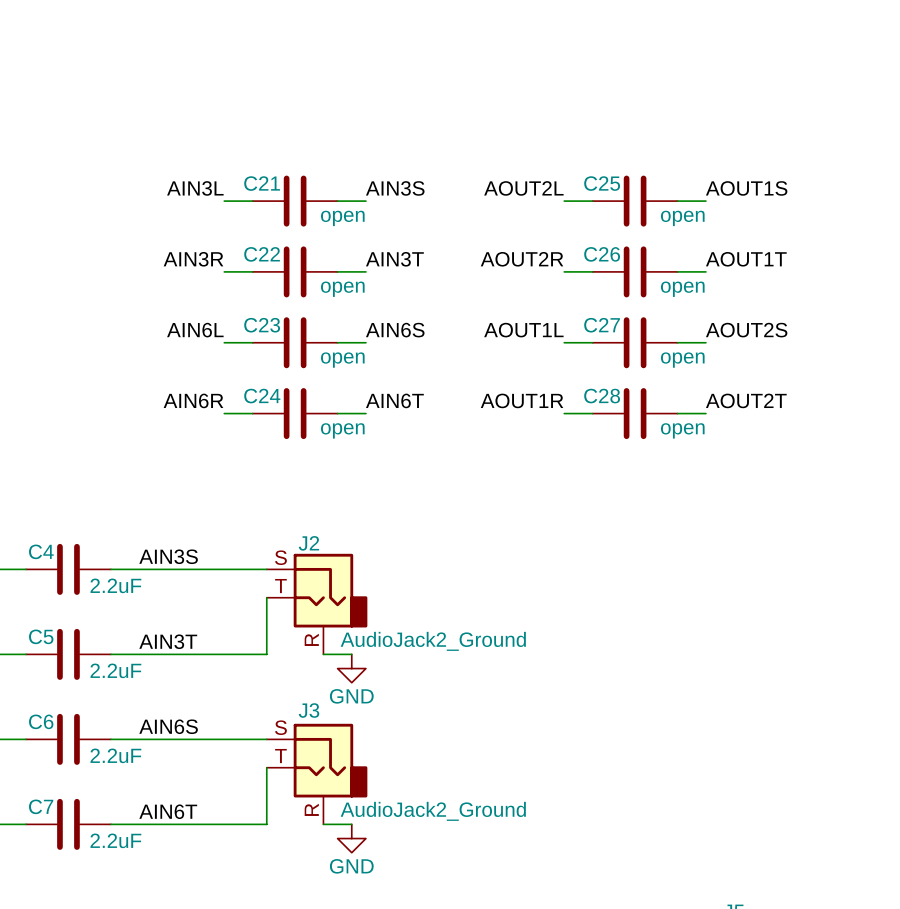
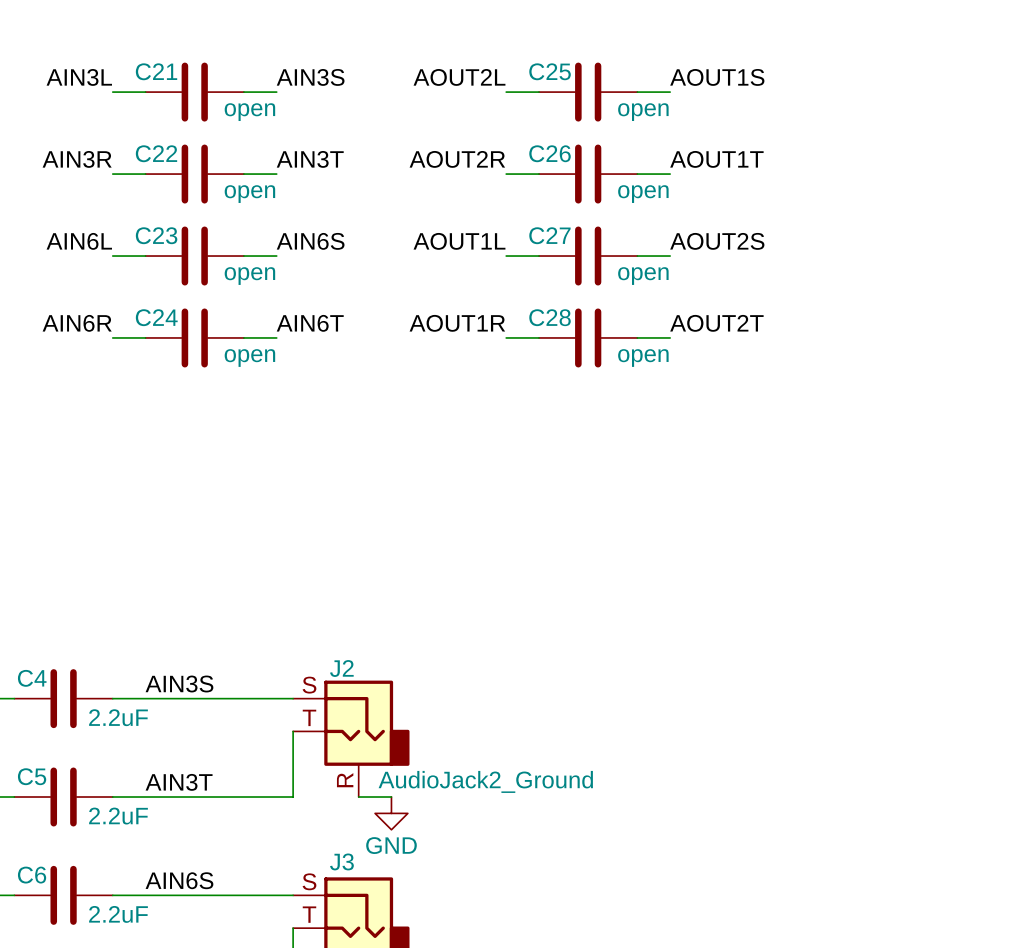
label position: AIN3L (195, 188) -> AIN3L (79, 77)
label position: AIN3S (395, 188) -> AIN3S (310, 77)
label position: AOUT2L (523, 188) -> AOUT2L (459, 77)
label position: AOUT1S (746, 188) -> AOUT1S (717, 77)
wire: (224, 201) (252, 201) -> (112, 92) (145, 92)
C21 position: (295, 201) -> (194, 92)
wire: (337, 201) (365, 201) -> (243, 92) (276, 92)
wire: (564, 201) (592, 201) -> (506, 92) (539, 92)
C25 position: (635, 201) -> (588, 92)
wire: (677, 201) (705, 201) -> (637, 92) (670, 92)
label position: AIN3R (193, 259) -> AIN3R (77, 159)
label position: AIN3T (394, 259) -> AIN3T (310, 159)
label position: AOUT2R (522, 259) -> AOUT2R (457, 159)
label position: AOUT1T (746, 259) -> AOUT1T (716, 159)
wire: (224, 271) (252, 271) -> (112, 174) (145, 174)
C22 position: (295, 271) -> (194, 174)
wire: (337, 271) (365, 271) -> (243, 174) (276, 174)
wire: (564, 271) (592, 271) -> (506, 174) (539, 174)
C26 position: (635, 271) -> (588, 174)
wire: (677, 271) (705, 271) -> (637, 174) (670, 174)
label position: AIN6L (195, 330) -> AIN6L (79, 241)
label position: AIN6S (395, 330) -> AIN6S (310, 241)
label position: AOUT1L (523, 330) -> AOUT1L (459, 241)
label position: AOUT2S (746, 330) -> AOUT2S (717, 241)
wire: (224, 342) (252, 342) -> (112, 256) (145, 256)
C23 position: (295, 342) -> (194, 256)
wire: (337, 342) (365, 342) -> (243, 256) (276, 256)
wire: (564, 342) (592, 342) -> (506, 256) (539, 256)
C27 position: (635, 342) -> (588, 256)
wire: (677, 342) (705, 342) -> (637, 256) (670, 256)
label position: AIN6R (193, 400) -> AIN6R (77, 323)
label position: AIN6T (394, 400) -> AIN6T (310, 323)
label position: AOUT1R (522, 400) -> AOUT1R (457, 323)
label position: AOUT2T (746, 400) -> AOUT2T (716, 323)
wire: (224, 413) (252, 413) -> (112, 337) (145, 337)
C24 position: (295, 413) -> (194, 337)
wire: (337, 413) (365, 413) -> (243, 337) (276, 337)
wire: (564, 413) (592, 413) -> (506, 337) (539, 337)
C28 position: (635, 413) -> (588, 337)
wire: (677, 413) (705, 413) -> (637, 337) (670, 337)

